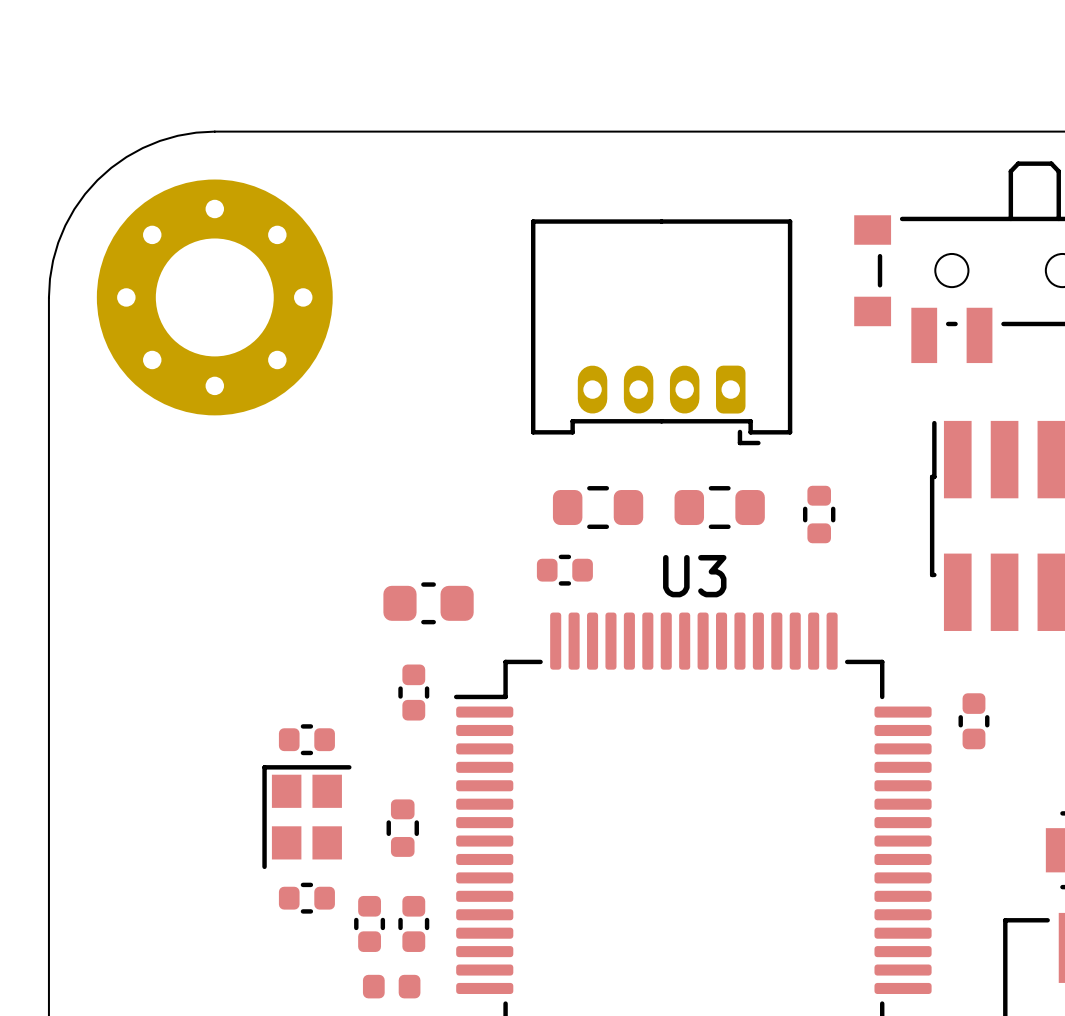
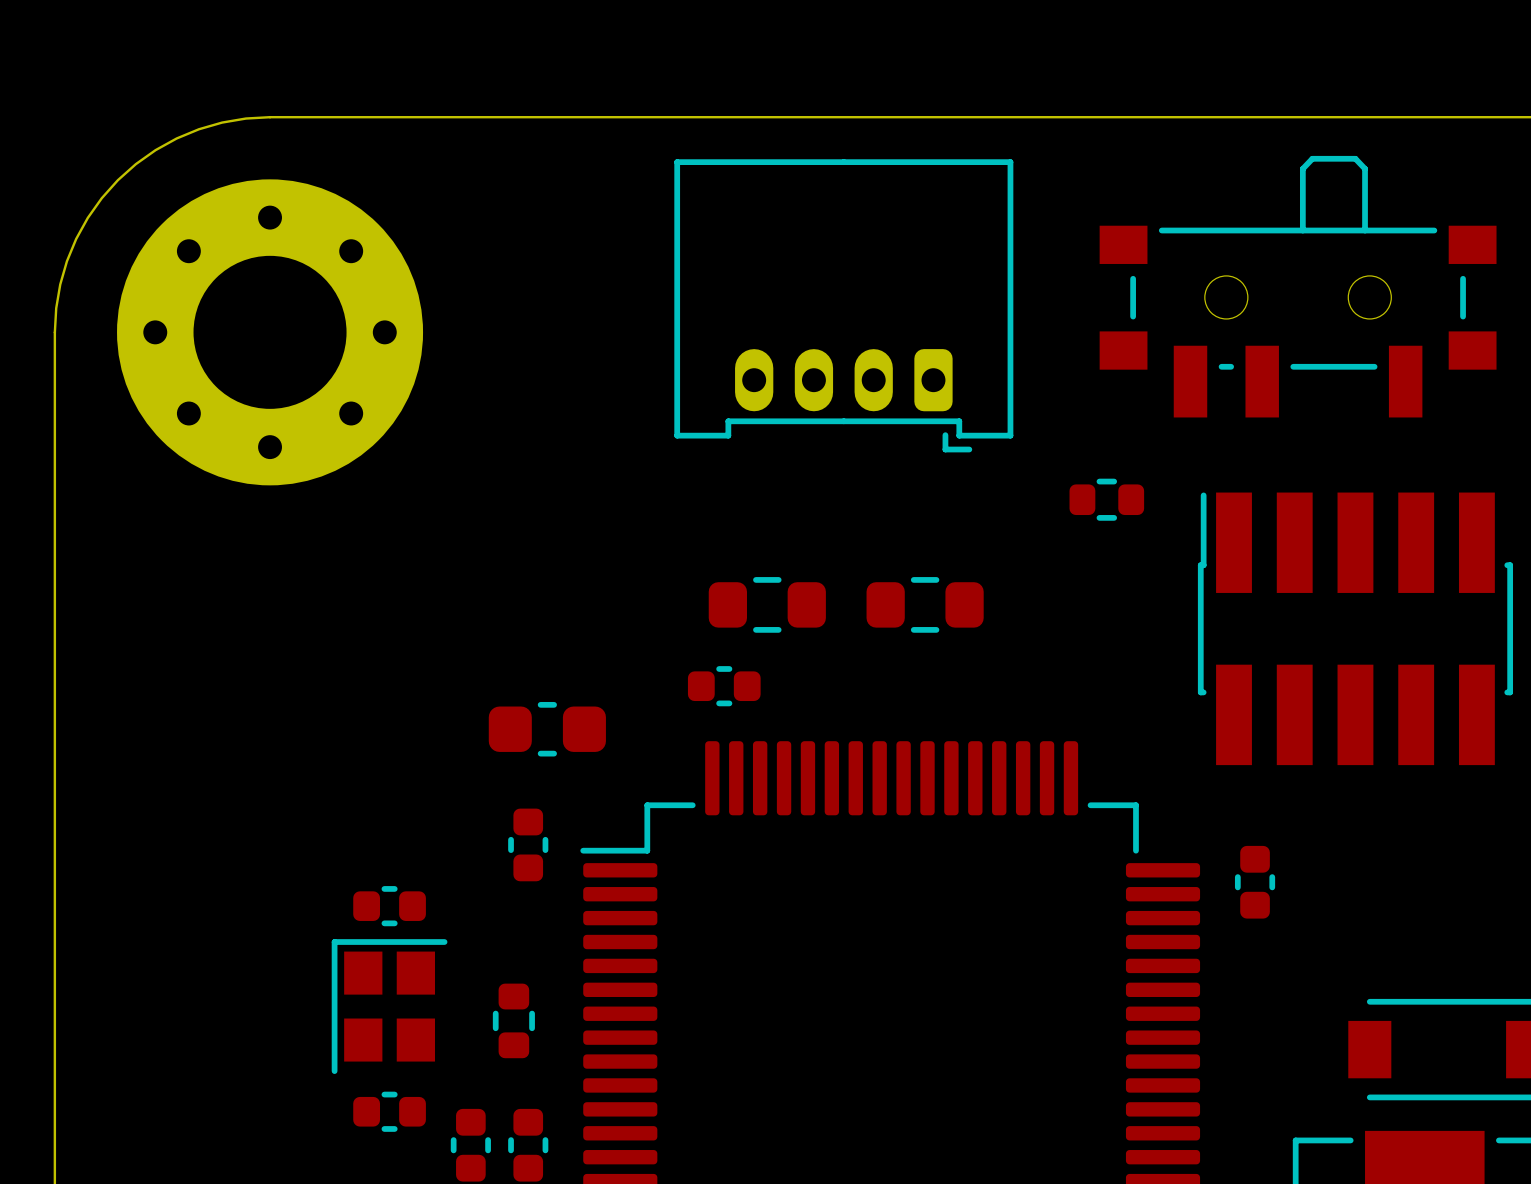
part position: (661, 332) -> (843, 305)
part rotation: 0° (819, 514) -> 90° clockwise (1106, 499)
part position: (819, 514) -> (1106, 499)
U3 name: U3 (694, 576) -> none

